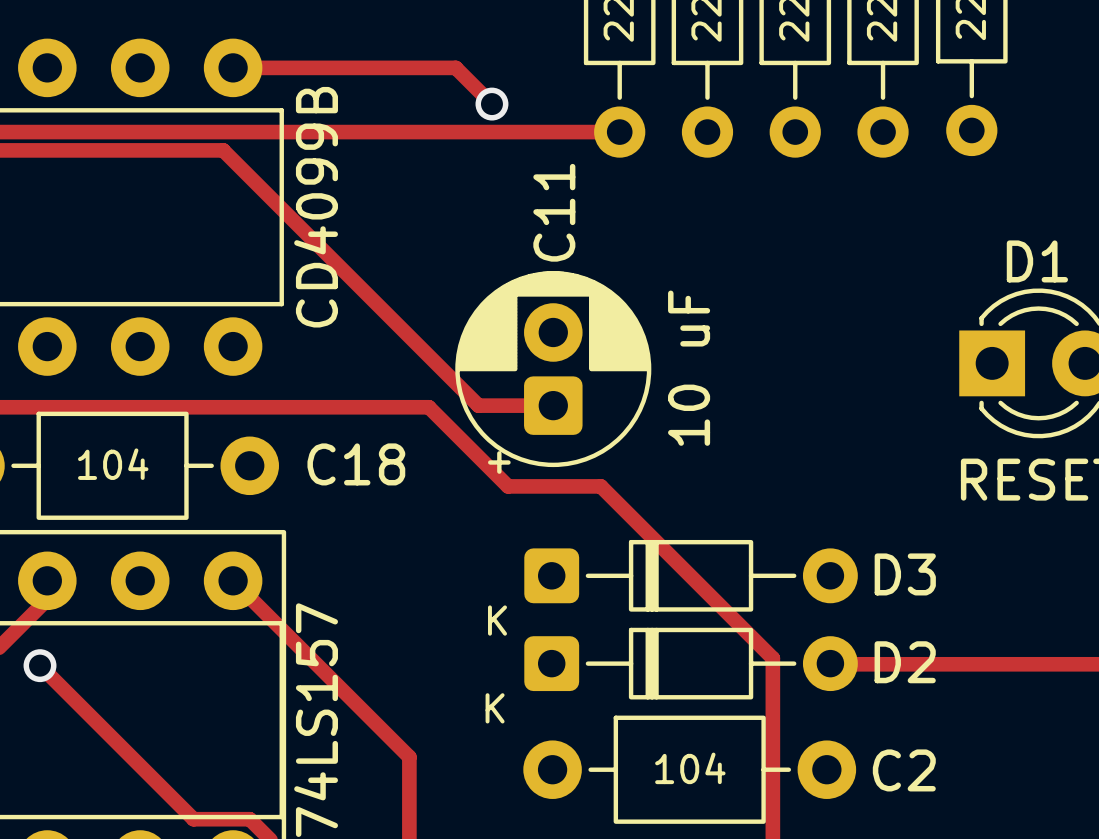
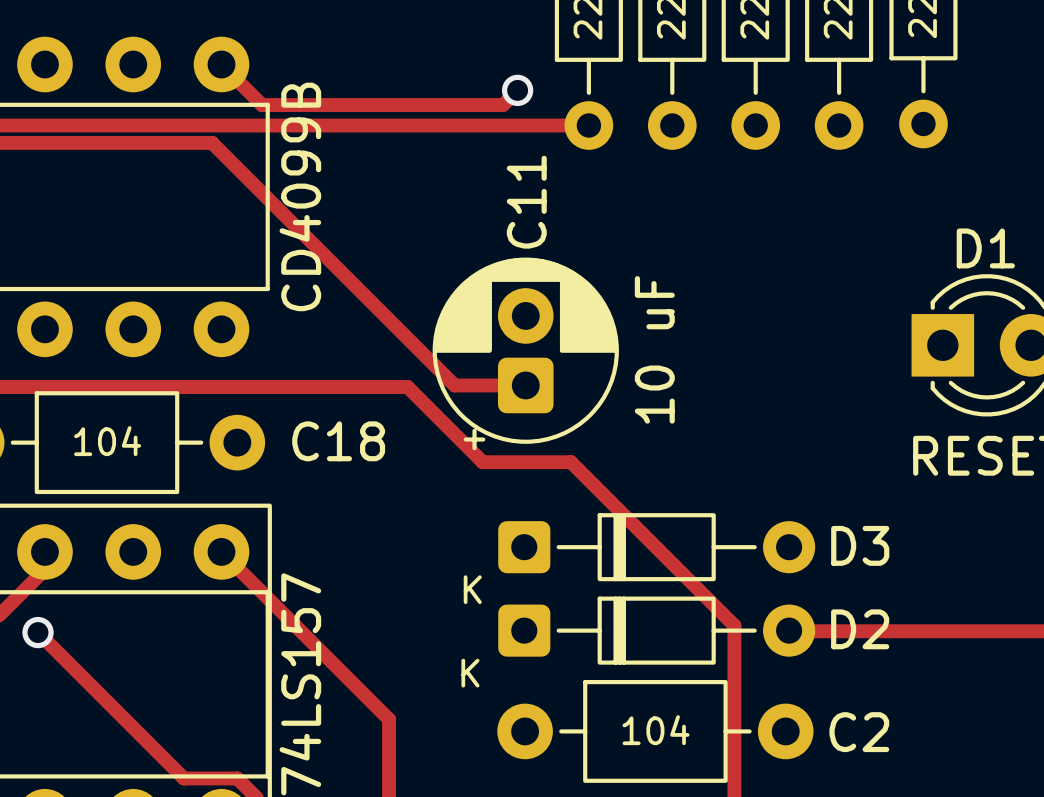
track: (233, 67) (455, 67) (491, 104) -> (221, 64) (262, 105) (502, 105) (517, 90)
via position: (491, 104) -> (517, 90)

